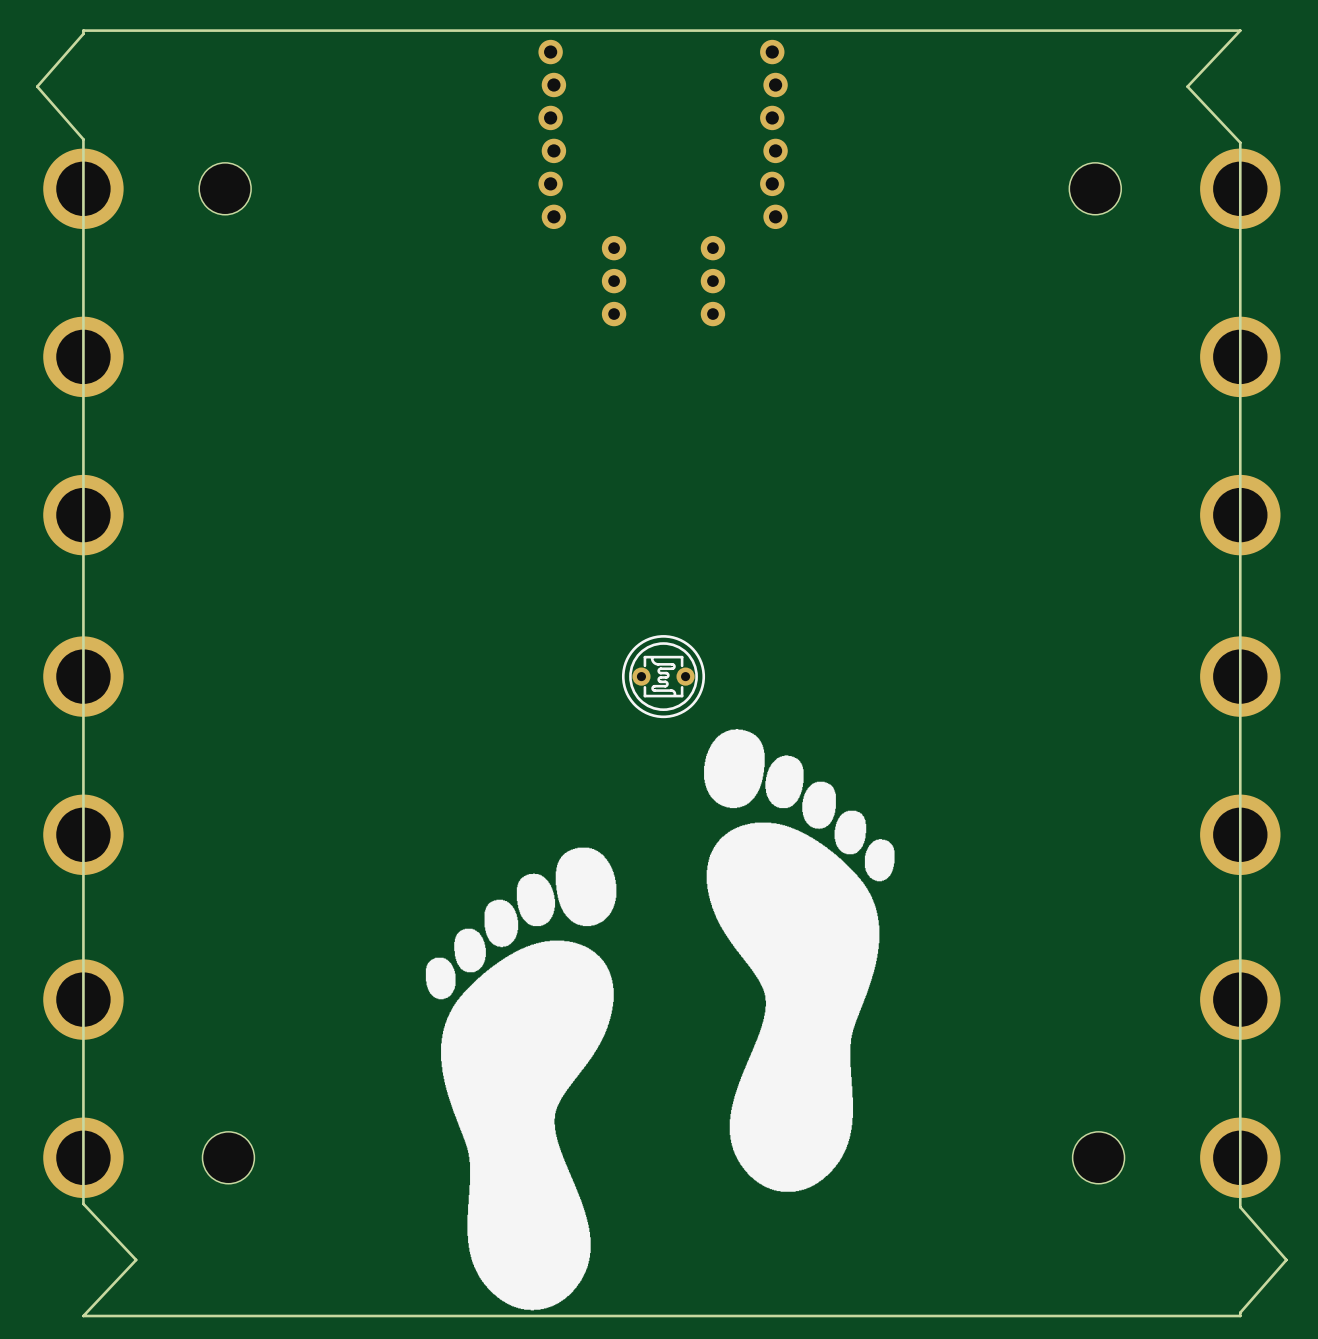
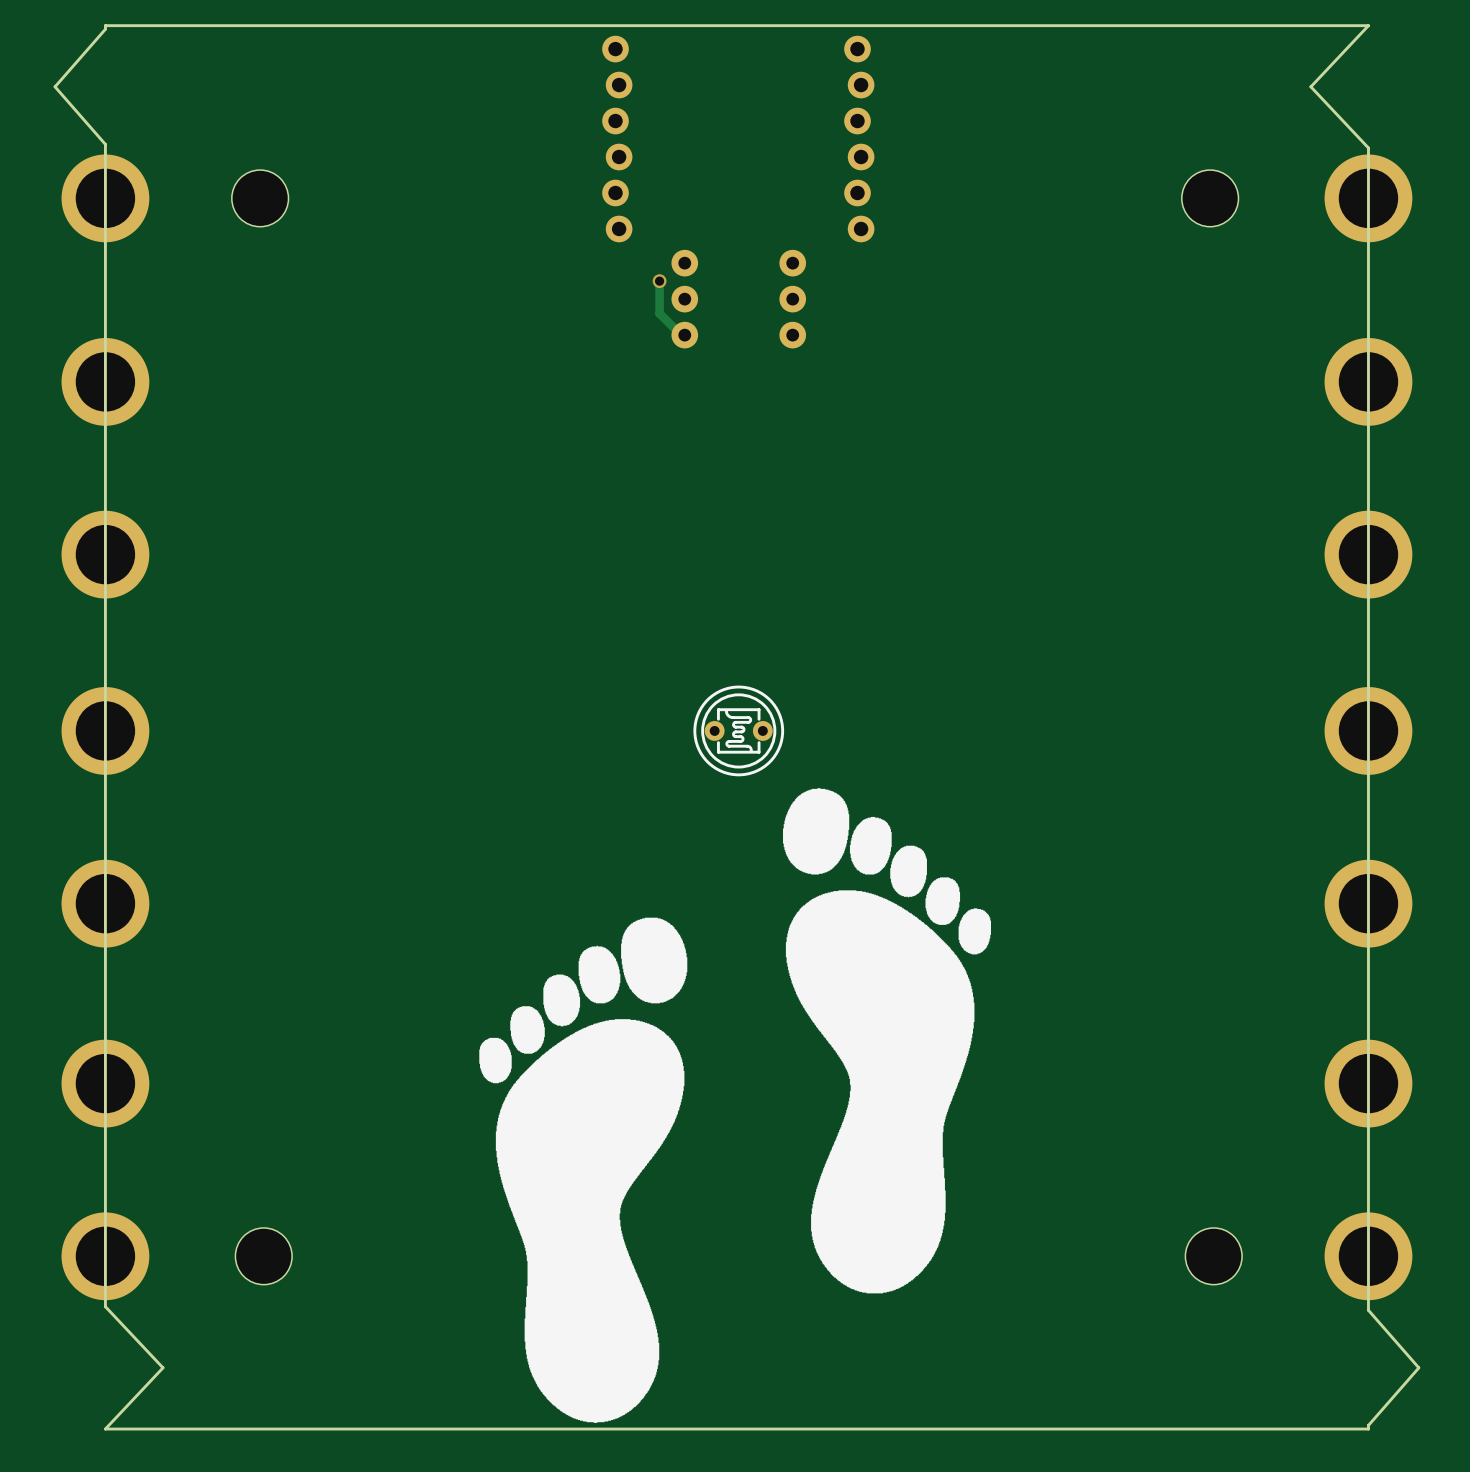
track: none -> (659, 281) (659, 313) (681, 335) (684, 335)
via: none -> (659, 281)

